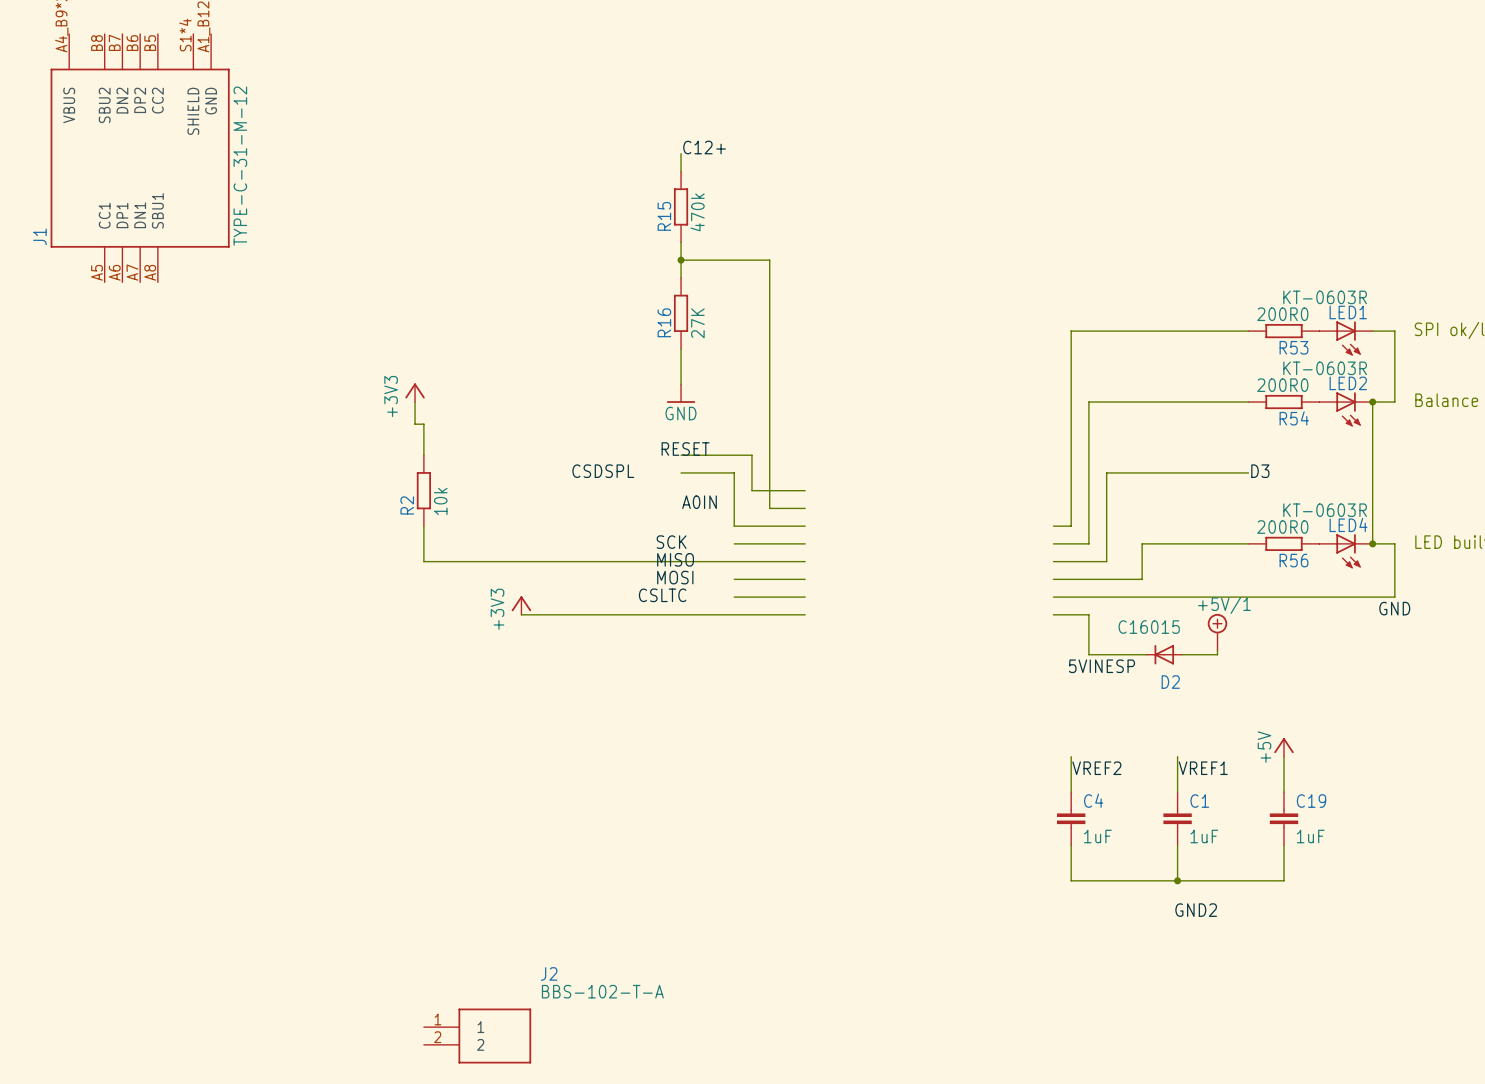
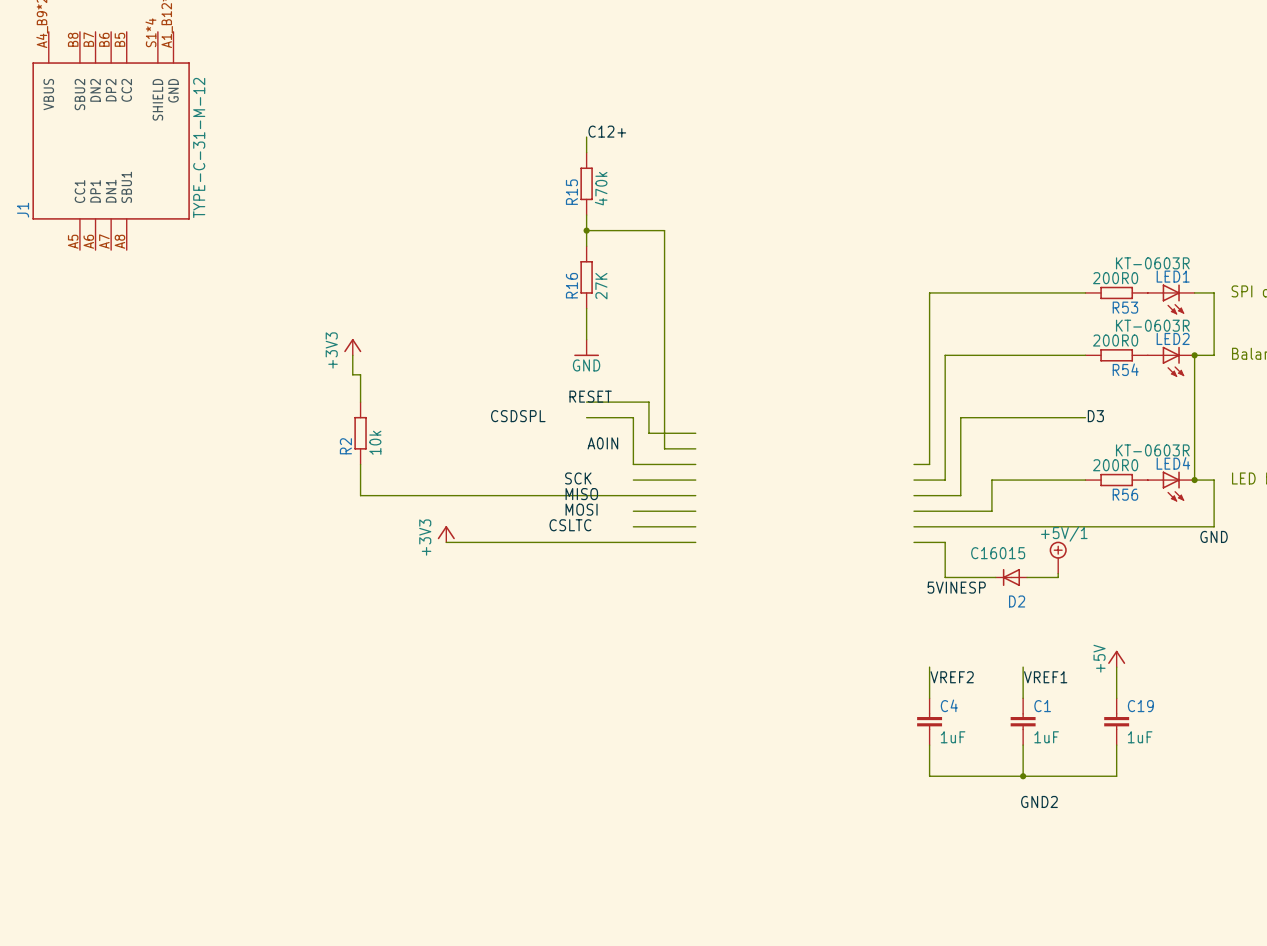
J2: BBS-102-T-A (477, 1036) -> none

